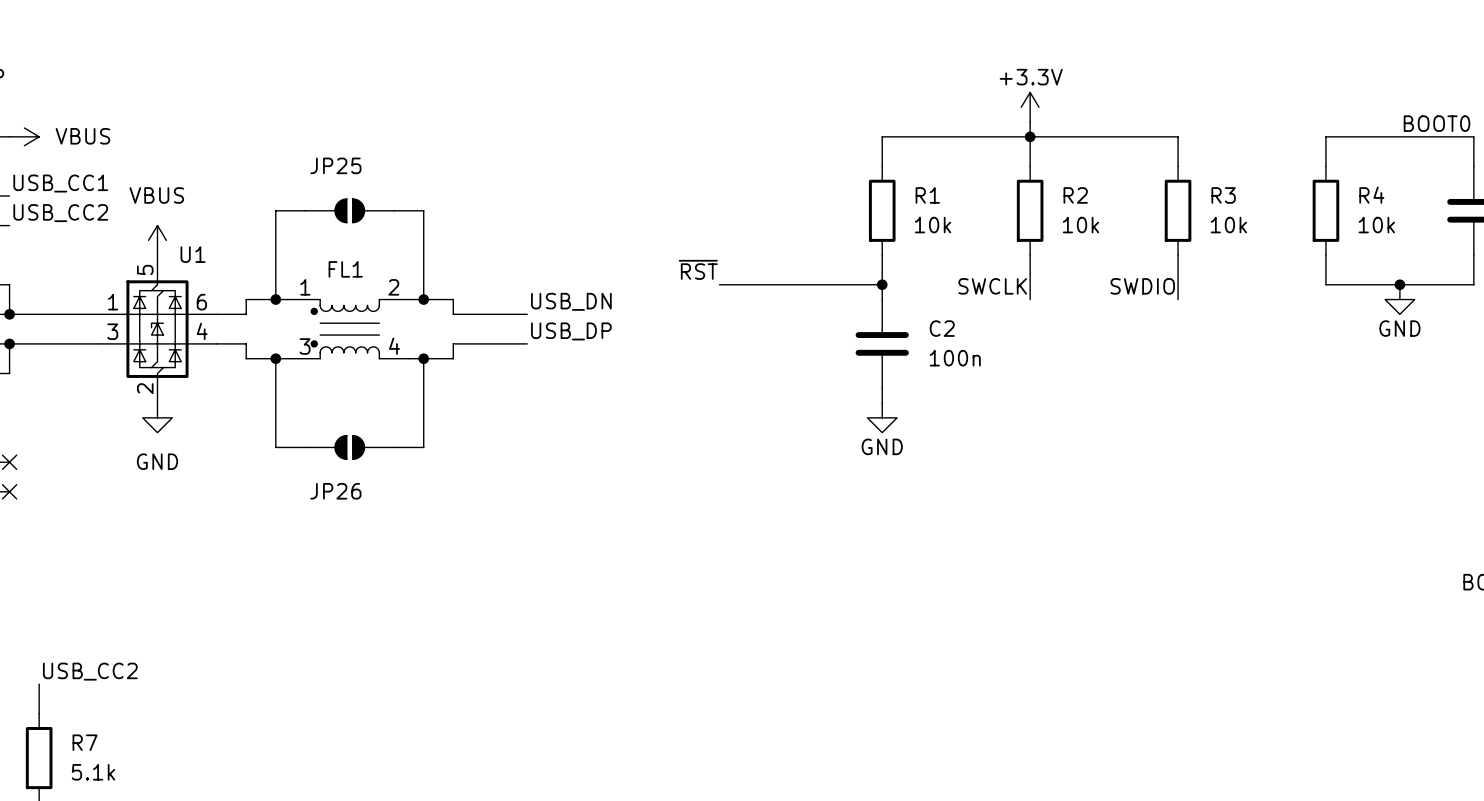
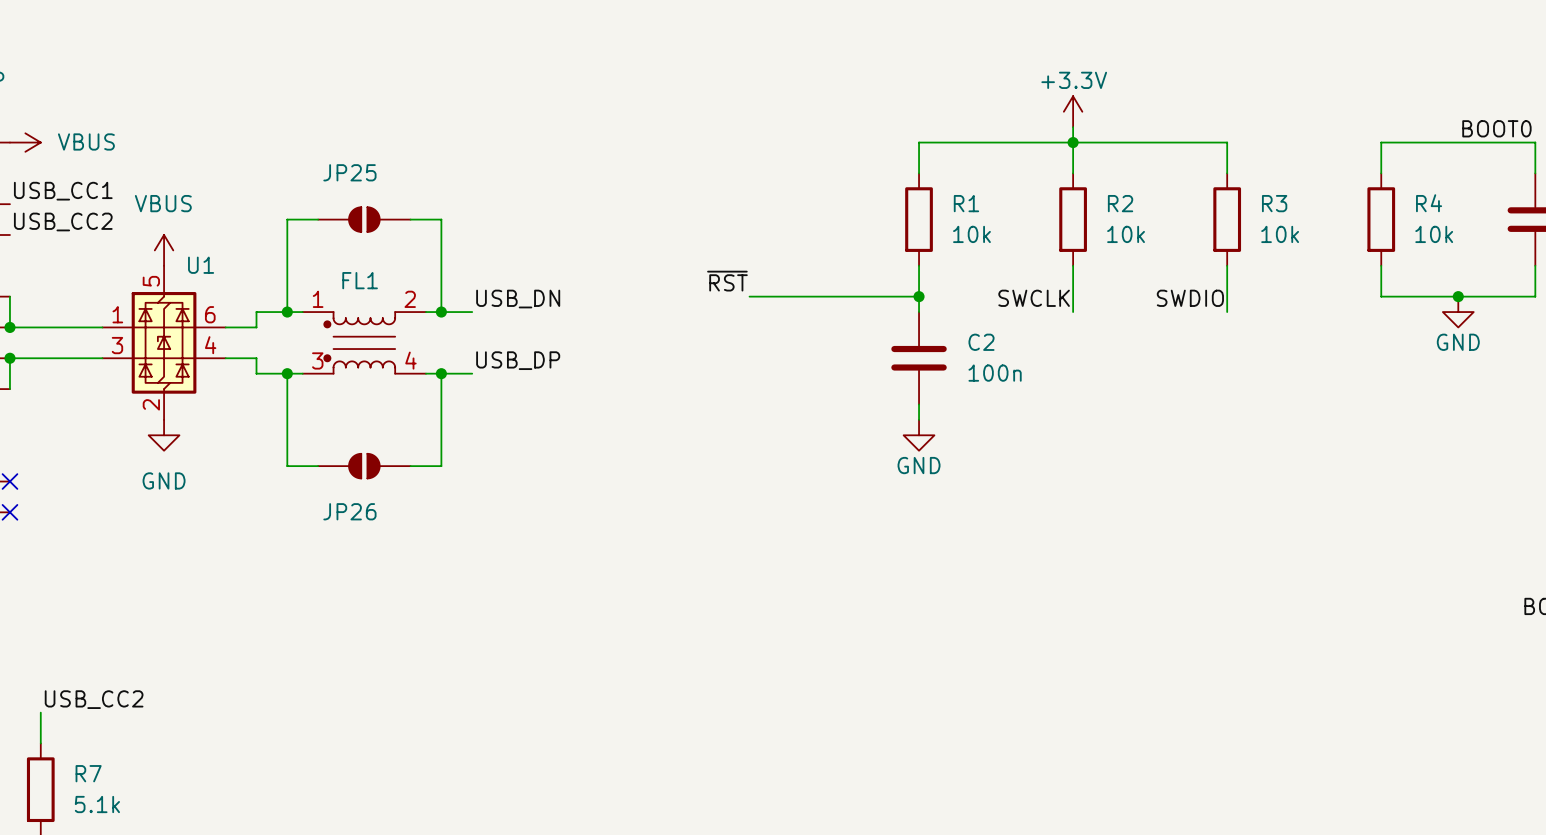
wire: (453, 299) (453, 314) (527, 314) -> none
label position: USB_DN (571, 301) -> USB_DN (518, 299)
label position: USB_DP (571, 331) -> USB_DP (518, 360)
wire: (527, 343) (453, 343) (453, 358) -> none

